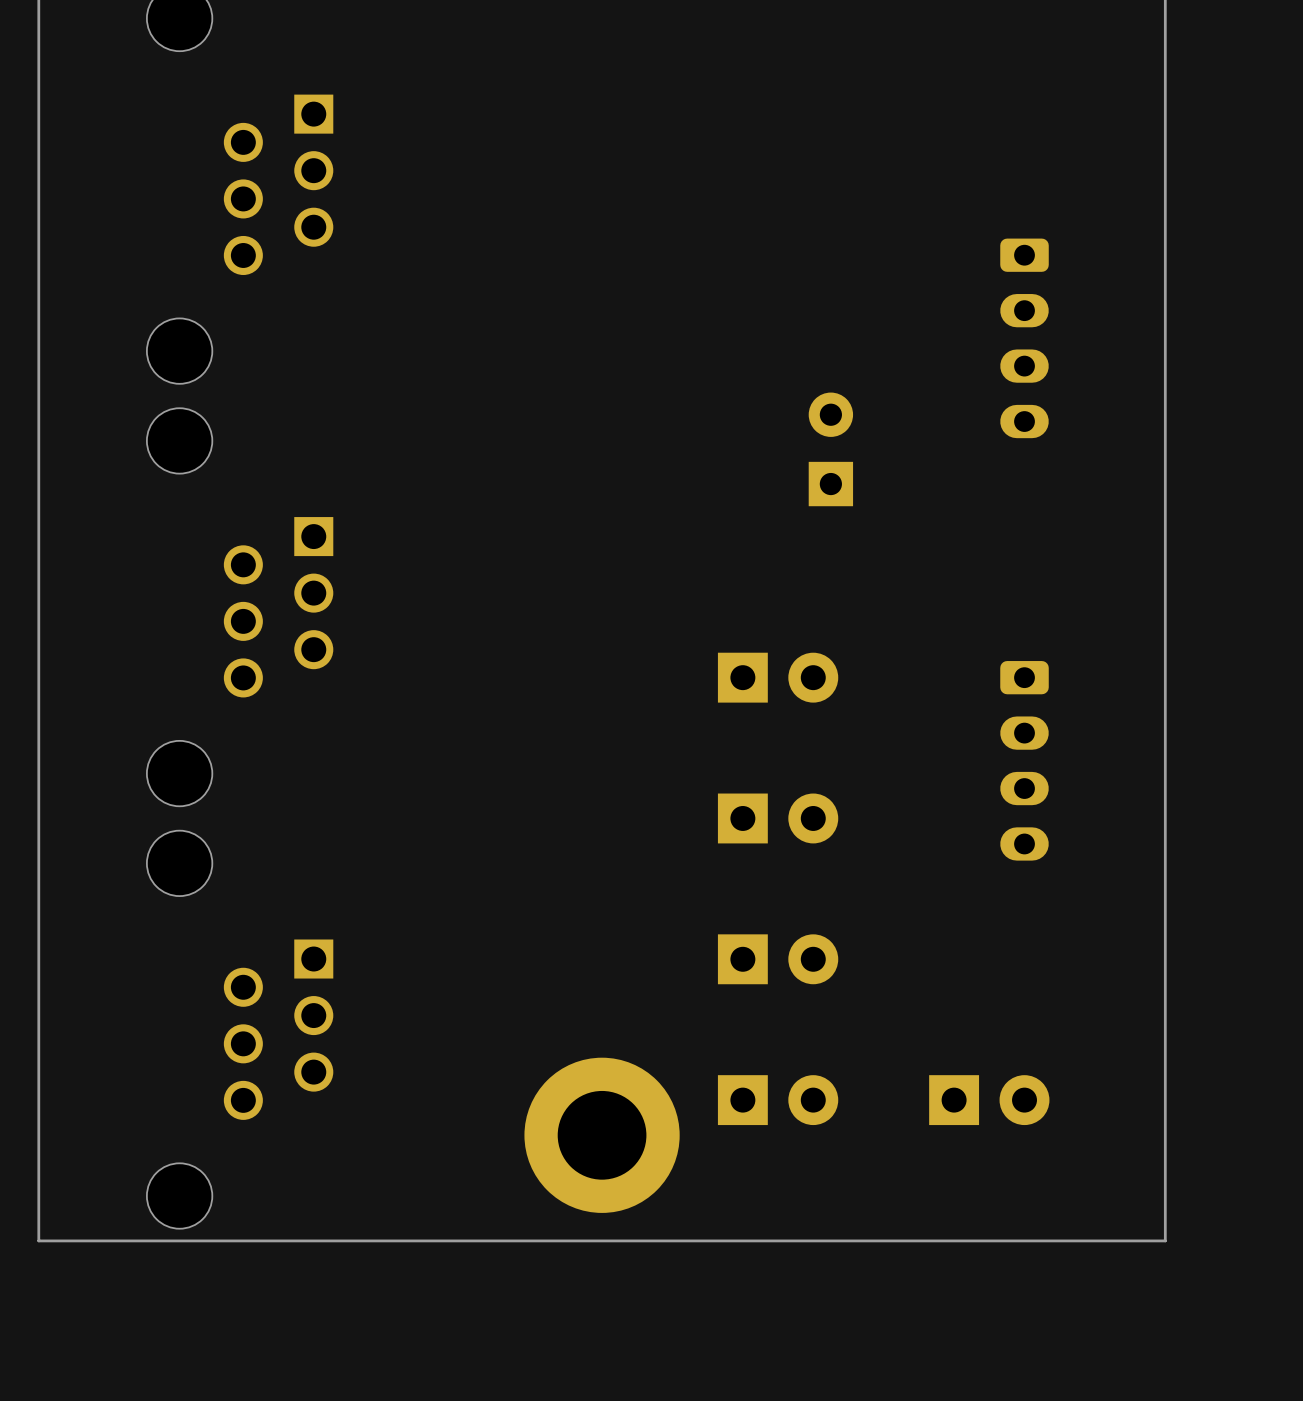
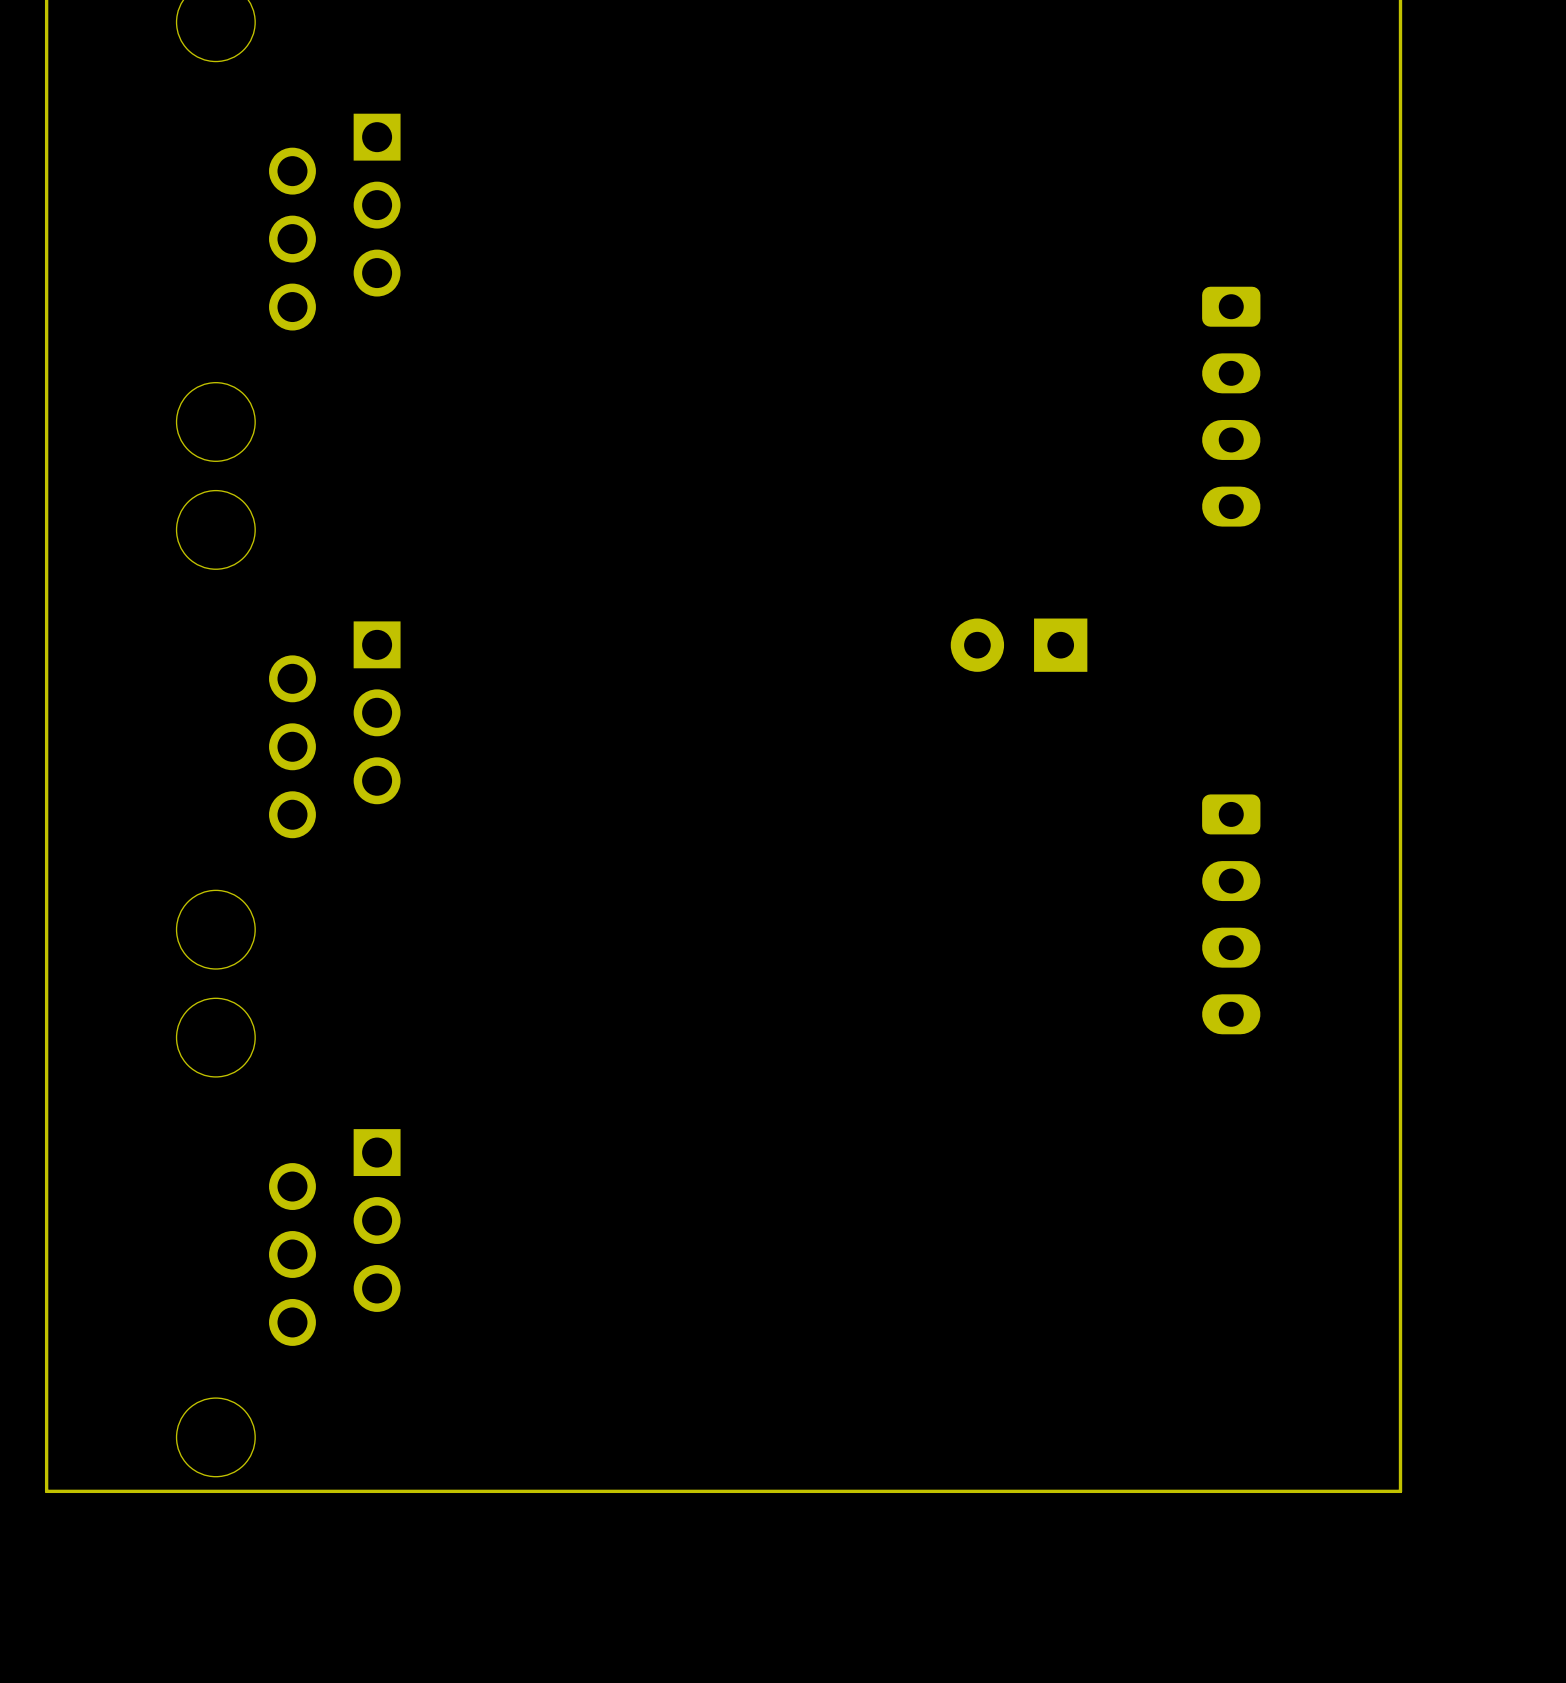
part rotation: 0° (830, 449) -> 90° counterclockwise (1019, 645)
part position: (830, 449) -> (1019, 645)
part: (778, 677) -> none
part: (778, 818) -> none
part: (778, 959) -> none
part: (778, 1100) -> none
part: (989, 1100) -> none
part: (602, 1135) -> none

